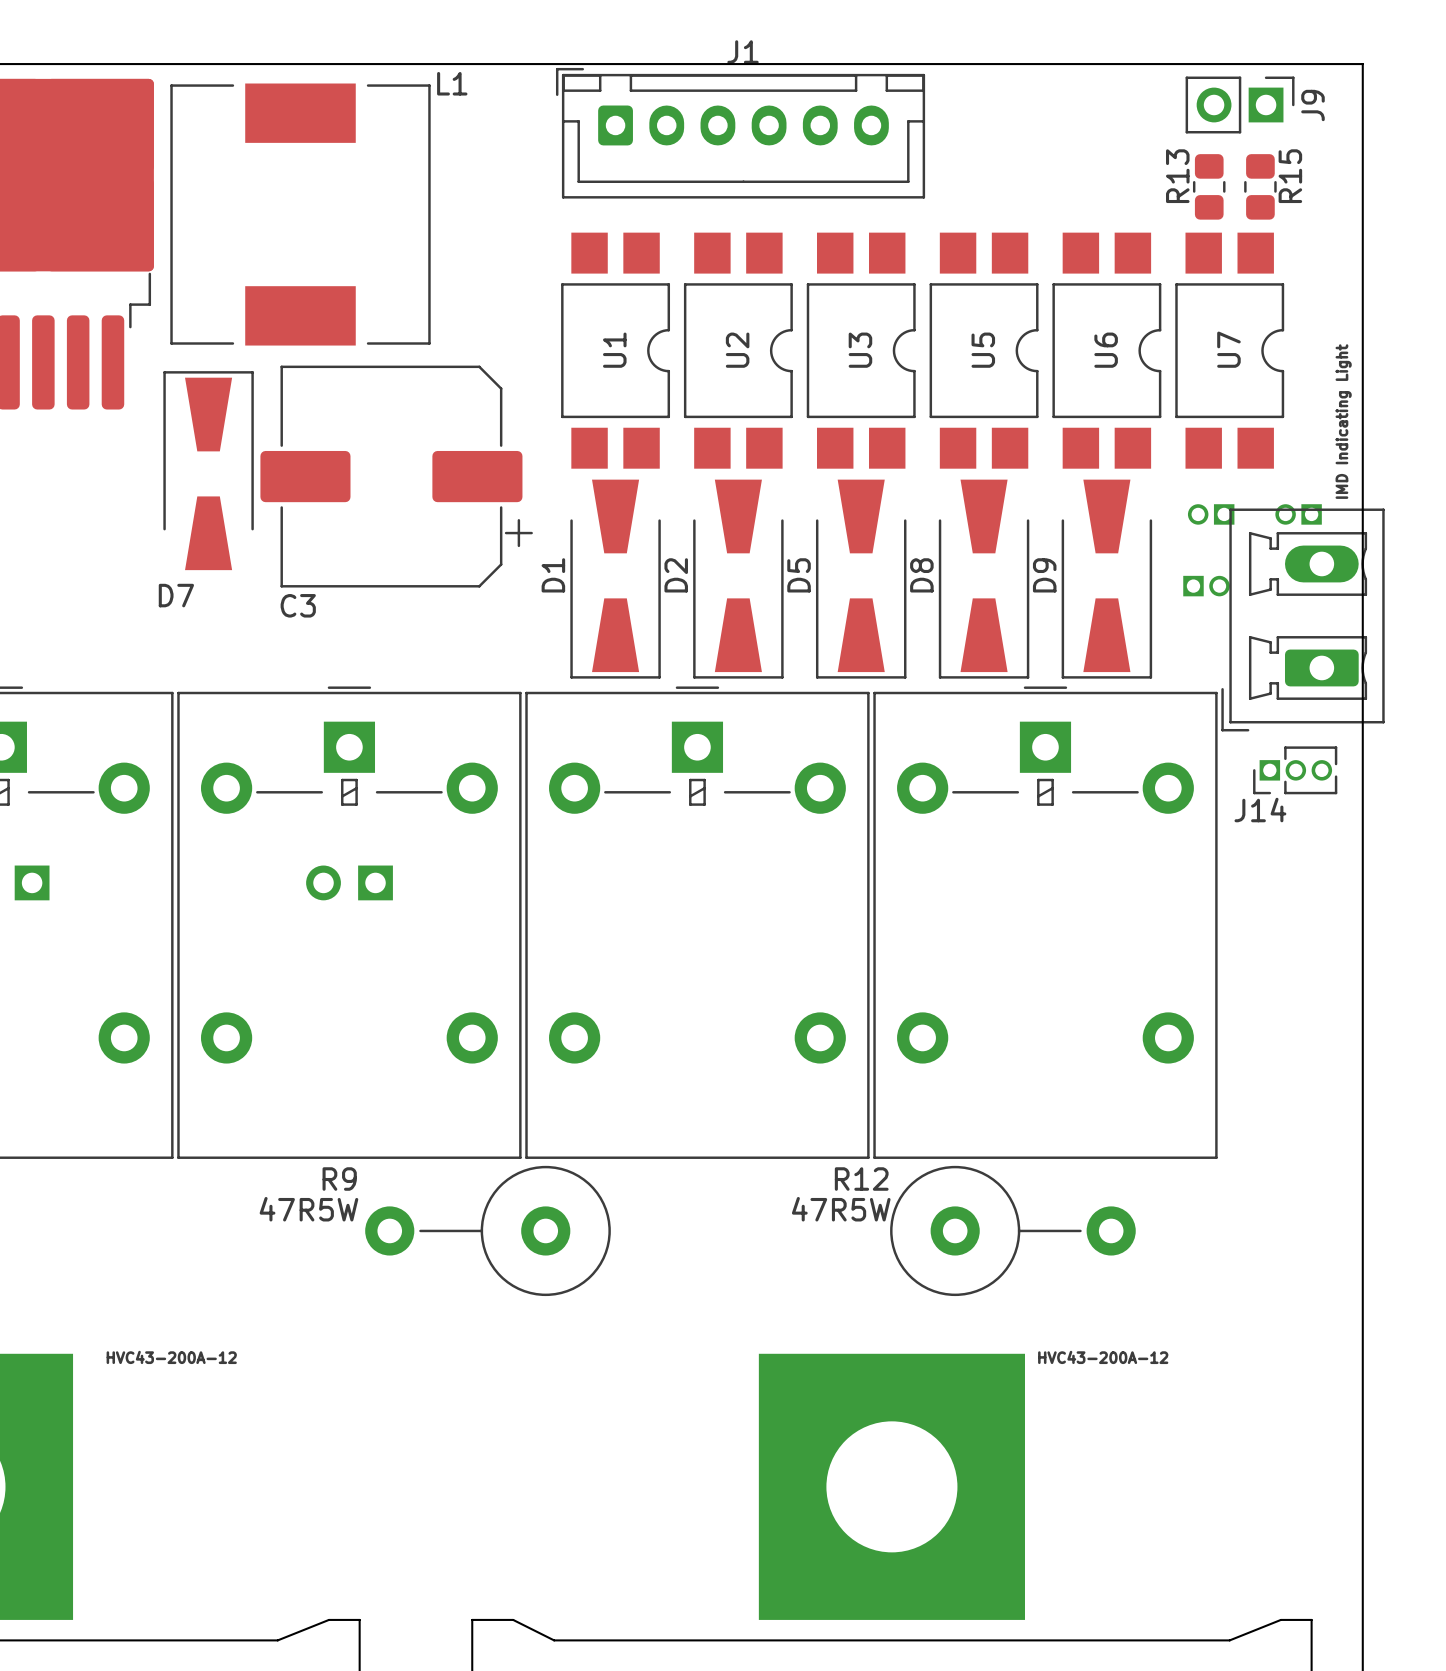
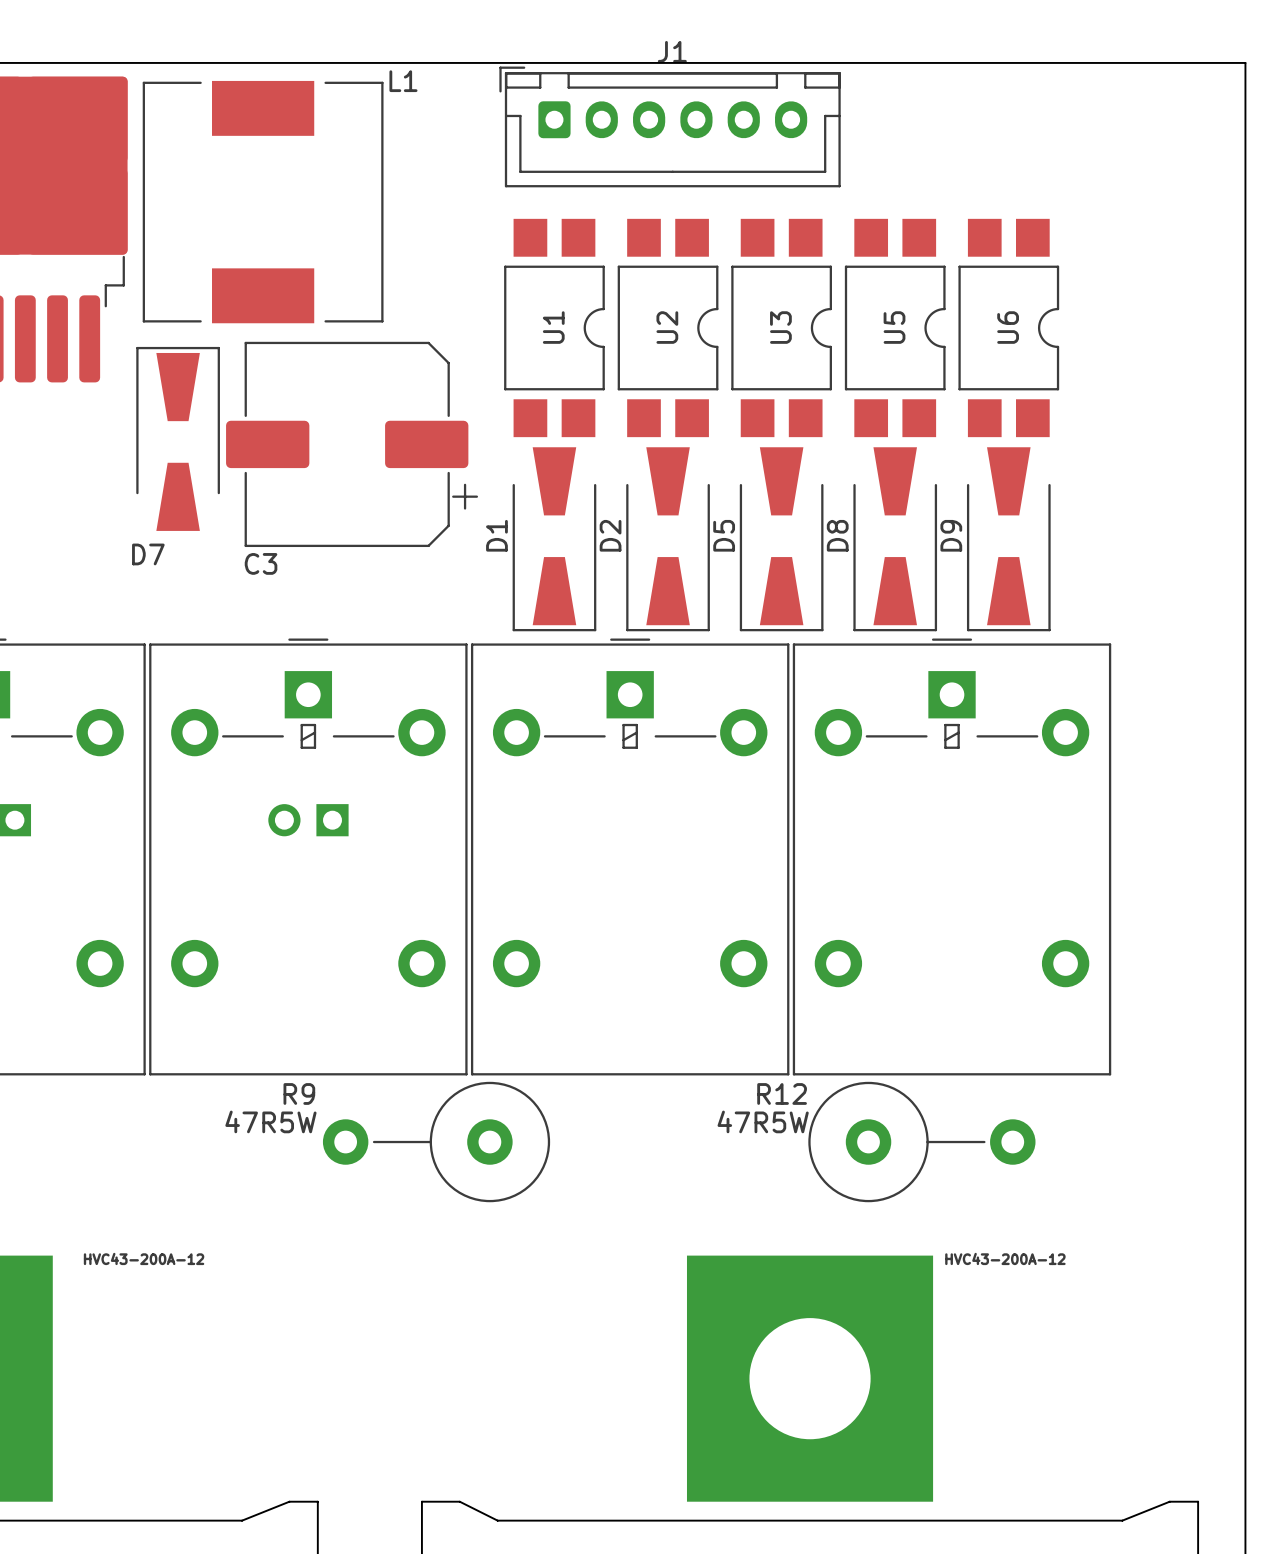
J9: (1240, 105) -> none
R15: (1209, 186) -> none
R13: (1260, 186) -> none
U7: (1229, 350) -> none
part: (1211, 514) -> none
part: (1298, 514) -> none
part: (1206, 586) -> none
part: IMD Indicating Light (1303, 619) -> none
J14: (1295, 770) -> none

